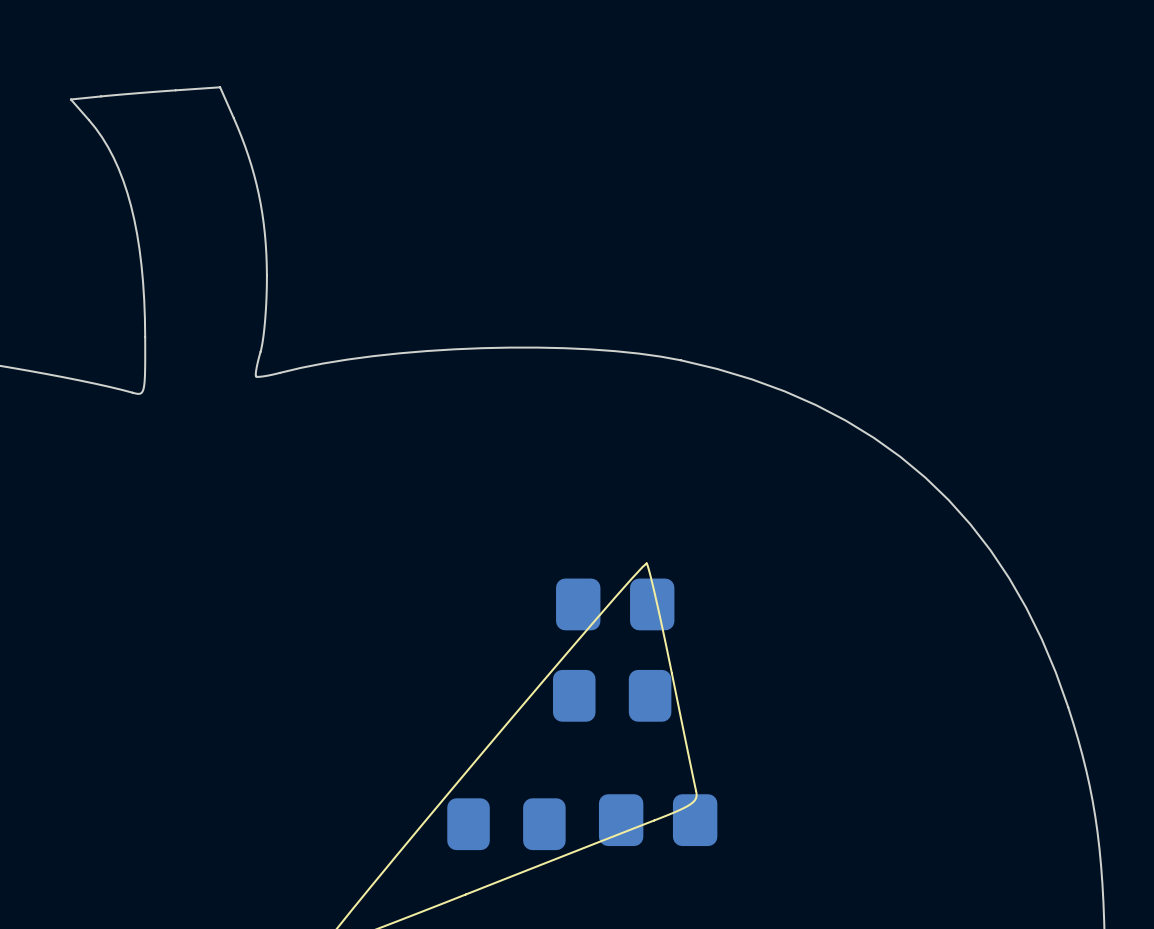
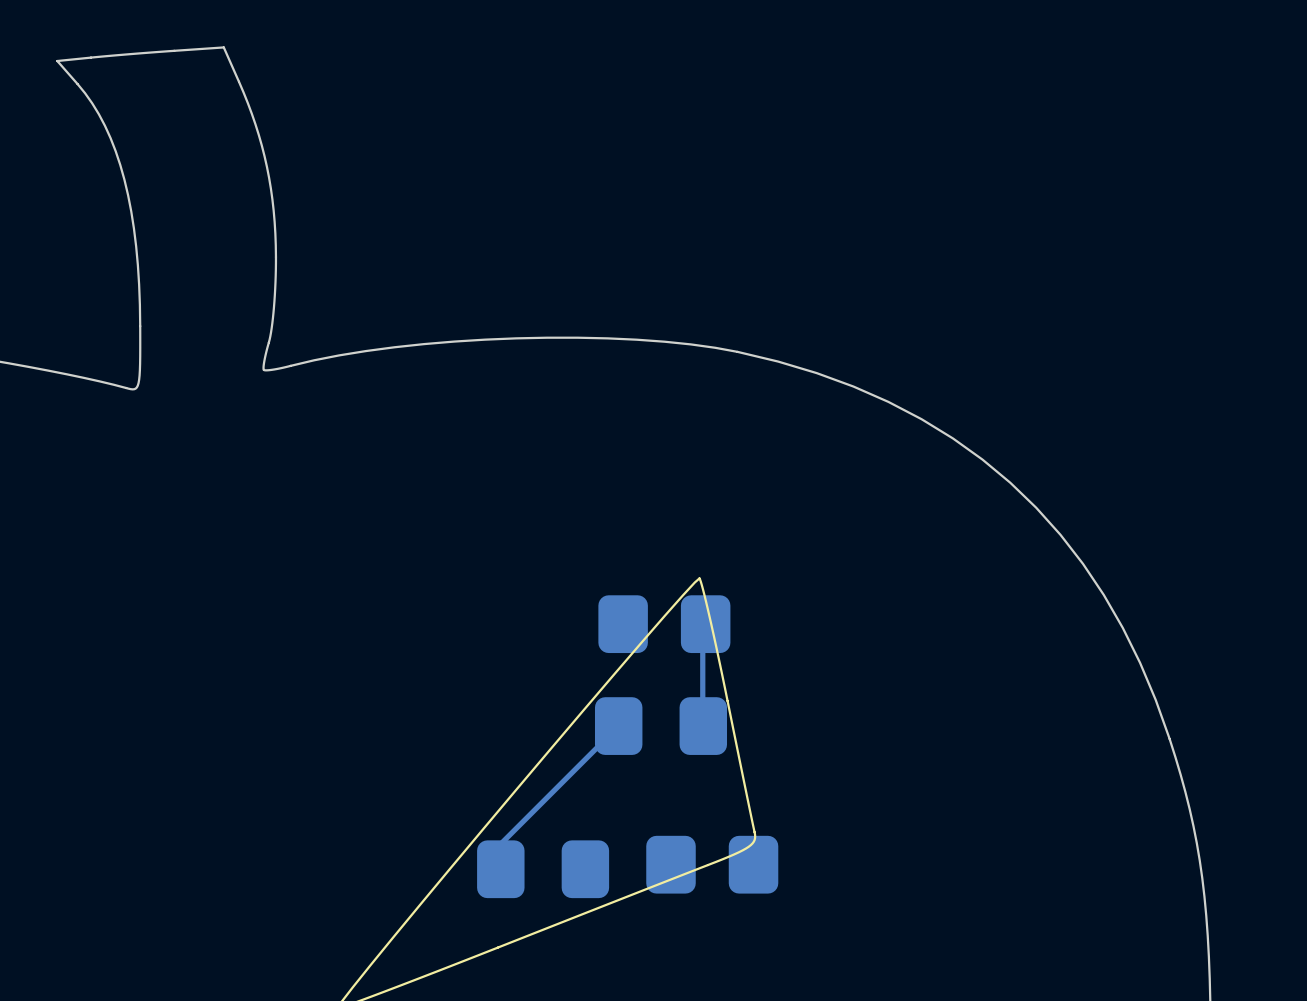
bottom track: none -> (702, 623) (702, 725)
bottom track: none -> (618, 726) (500, 843) (500, 869)

